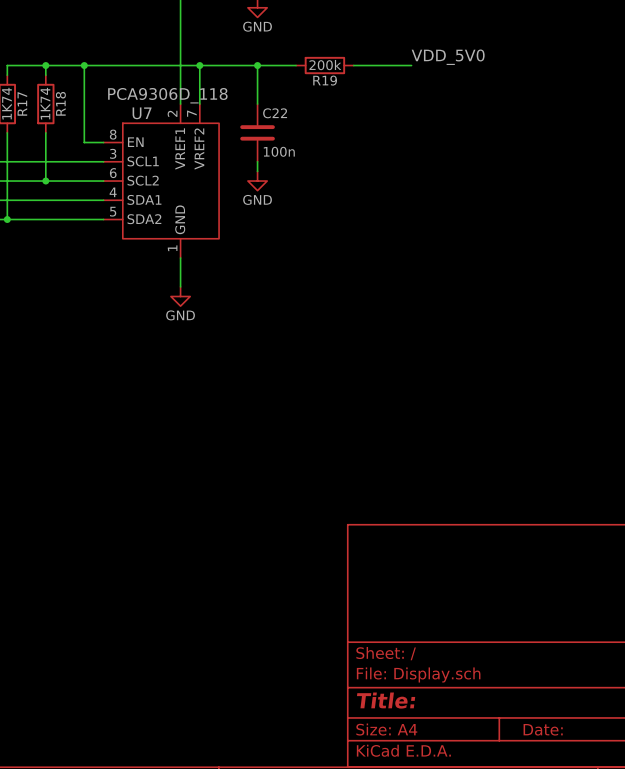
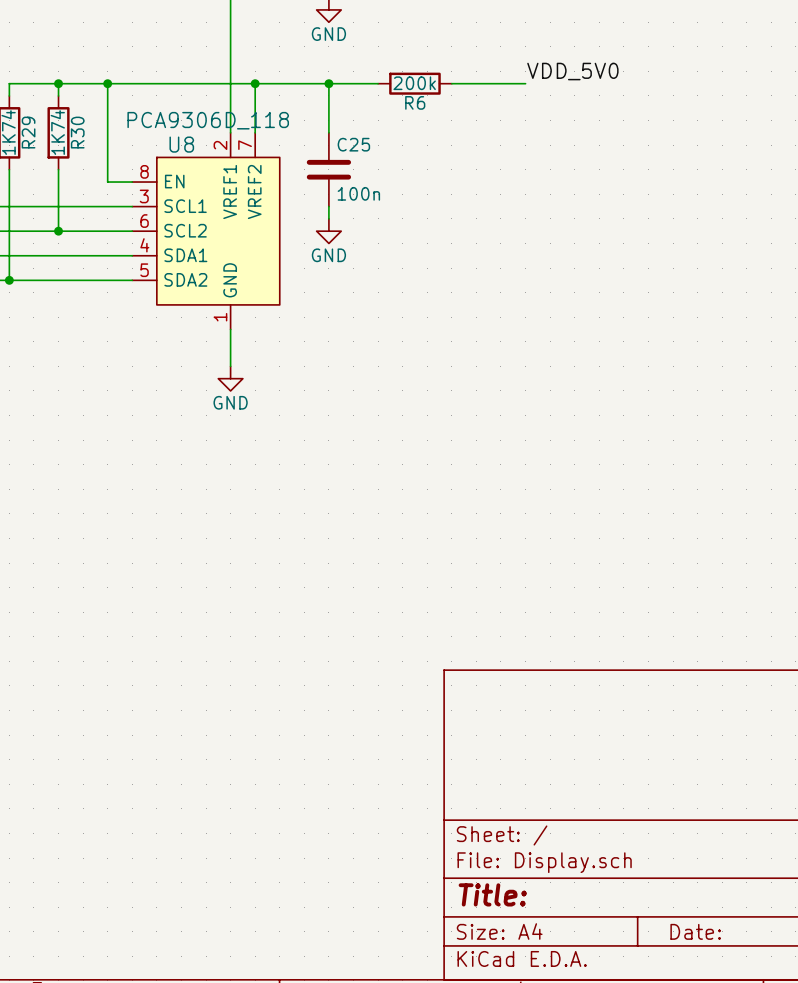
R19 name: R19 (325, 80) -> R6 (415, 102)
R17 name: R17 (22, 103) -> R29 (28, 132)
R18 name: R18 (60, 103) -> R30 (77, 132)
U7 name: U7 (142, 113) -> U8 (181, 144)
C22 name: C22 (275, 113) -> C25 (353, 144)

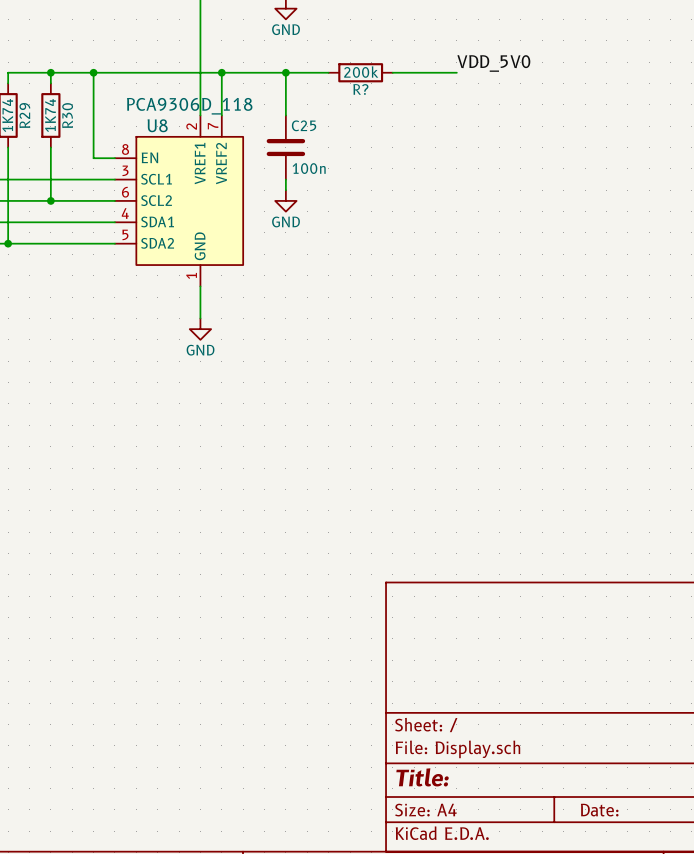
R6 name: R6 (415, 102) -> R? (360, 89)

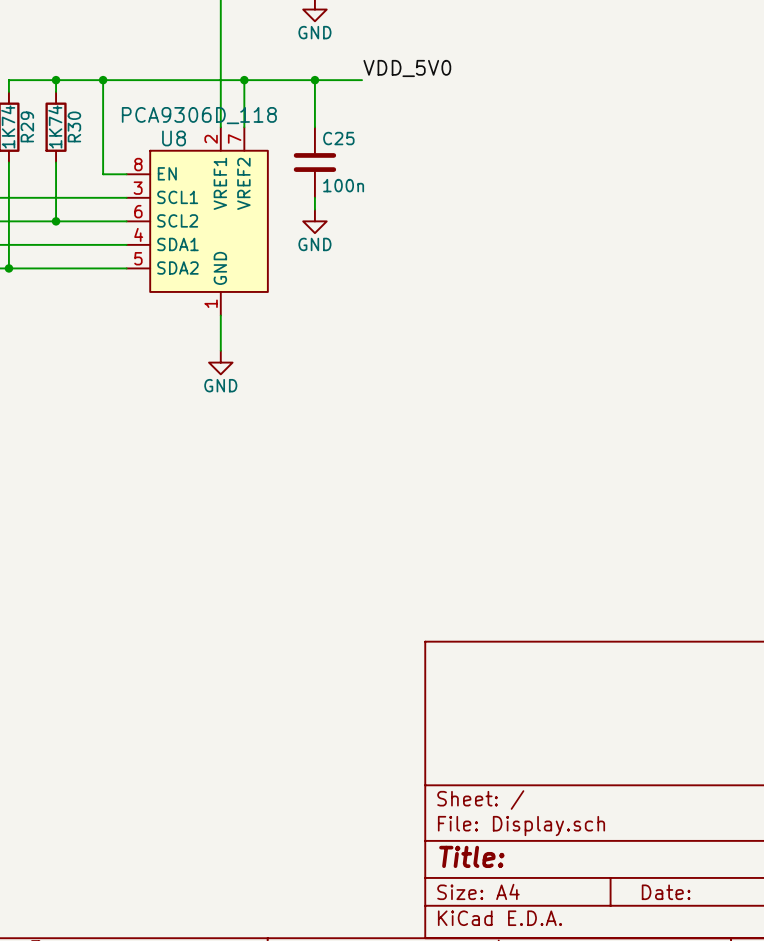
label position: VDD_5V0 (493, 63) -> VDD_5V0 (407, 68)
R?: 200k (360, 72) -> none
wire: (392, 72) (456, 72) -> none

